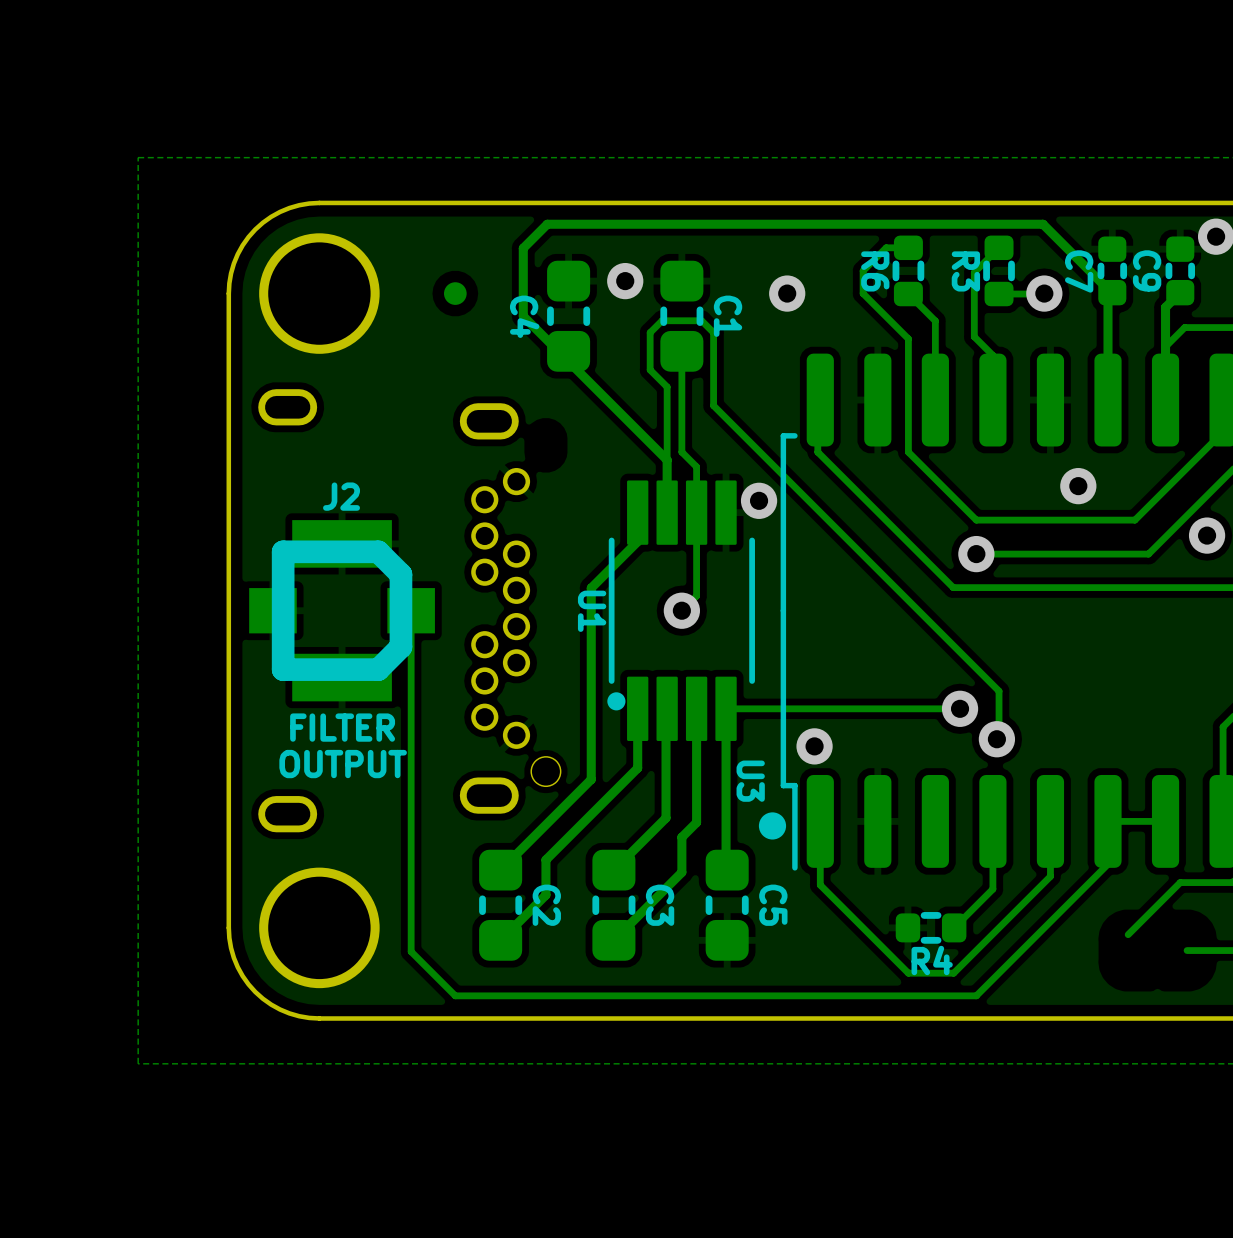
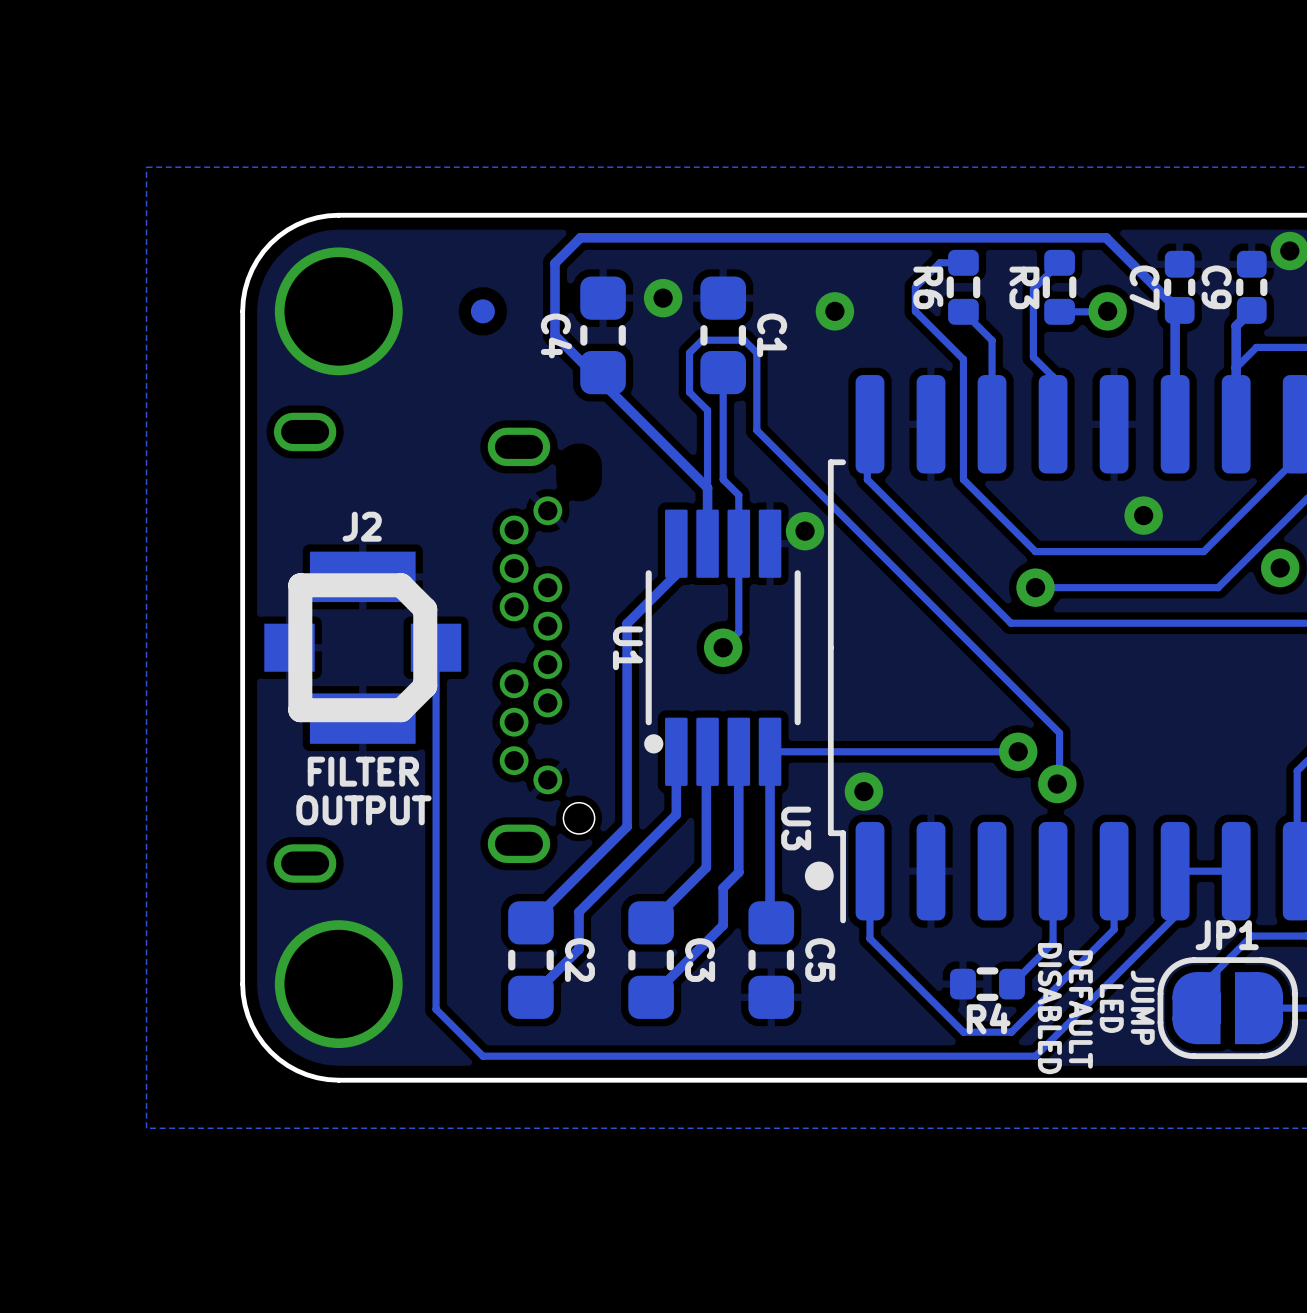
text: none -> DISABLED (1049, 1008)
text: none -> LED (1111, 1008)
text: none -> JUMP (1142, 1007)
JP1: none -> (1227, 1008)
text: none -> DEFAULT (1080, 1009)

